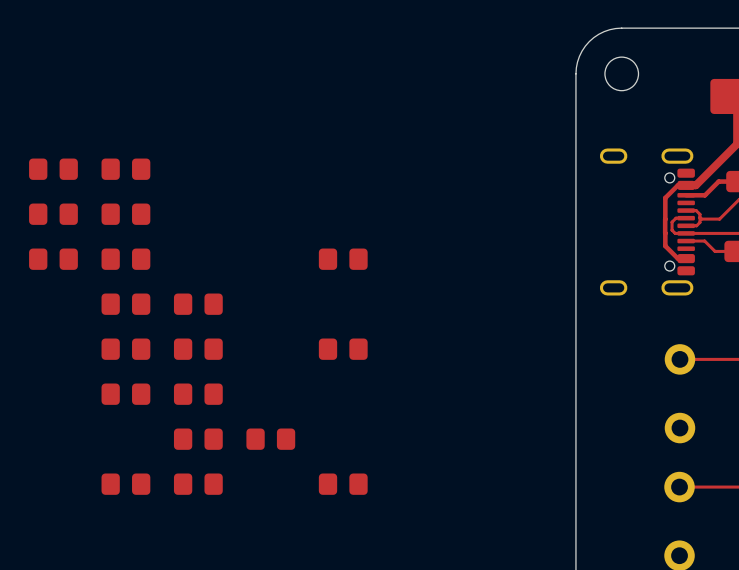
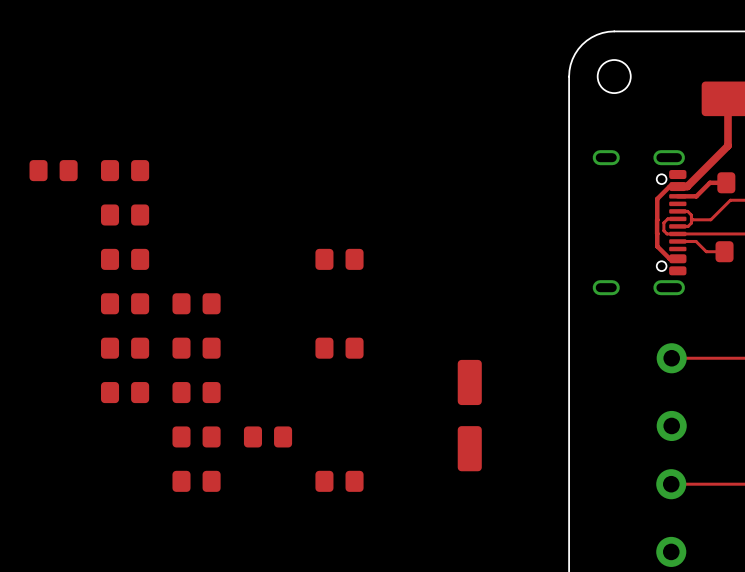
part: (53, 214) -> none
part: (53, 259) -> none
part: none -> (469, 415)
part: (125, 484) -> none

